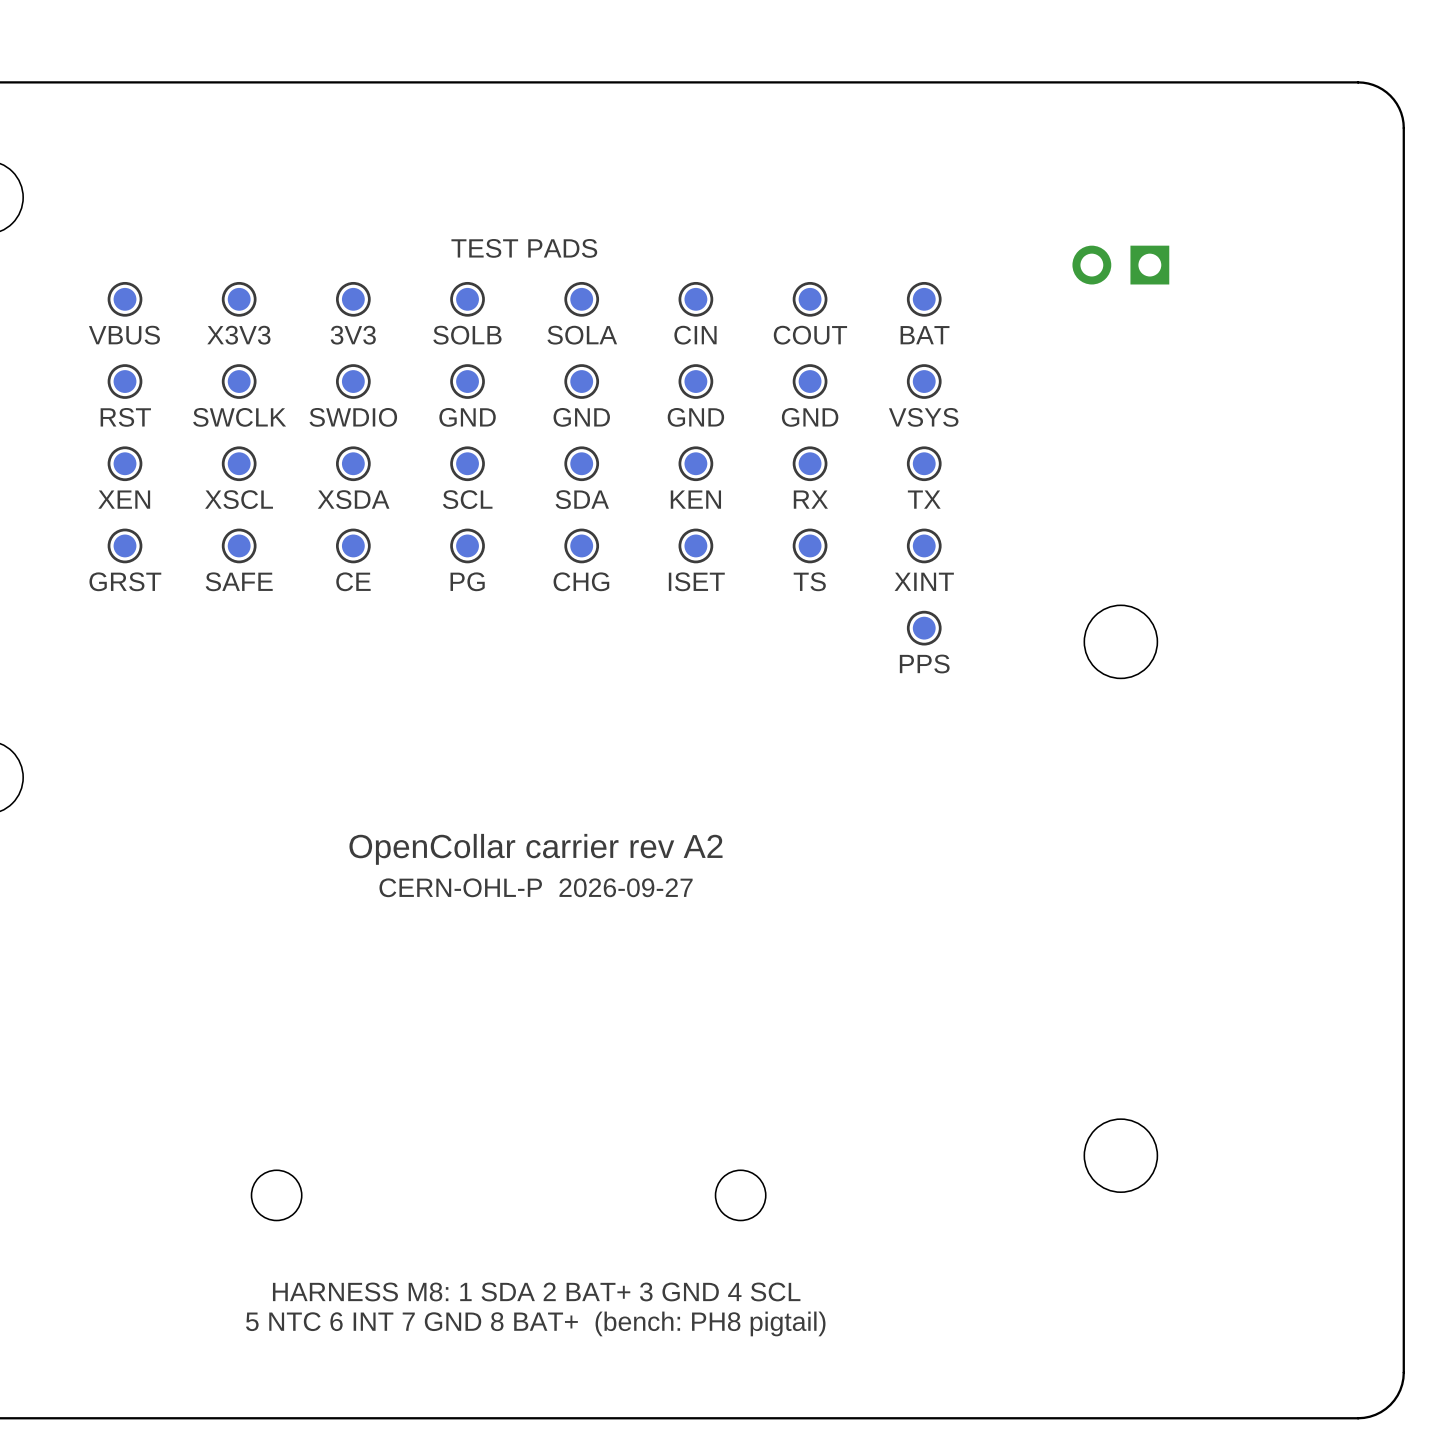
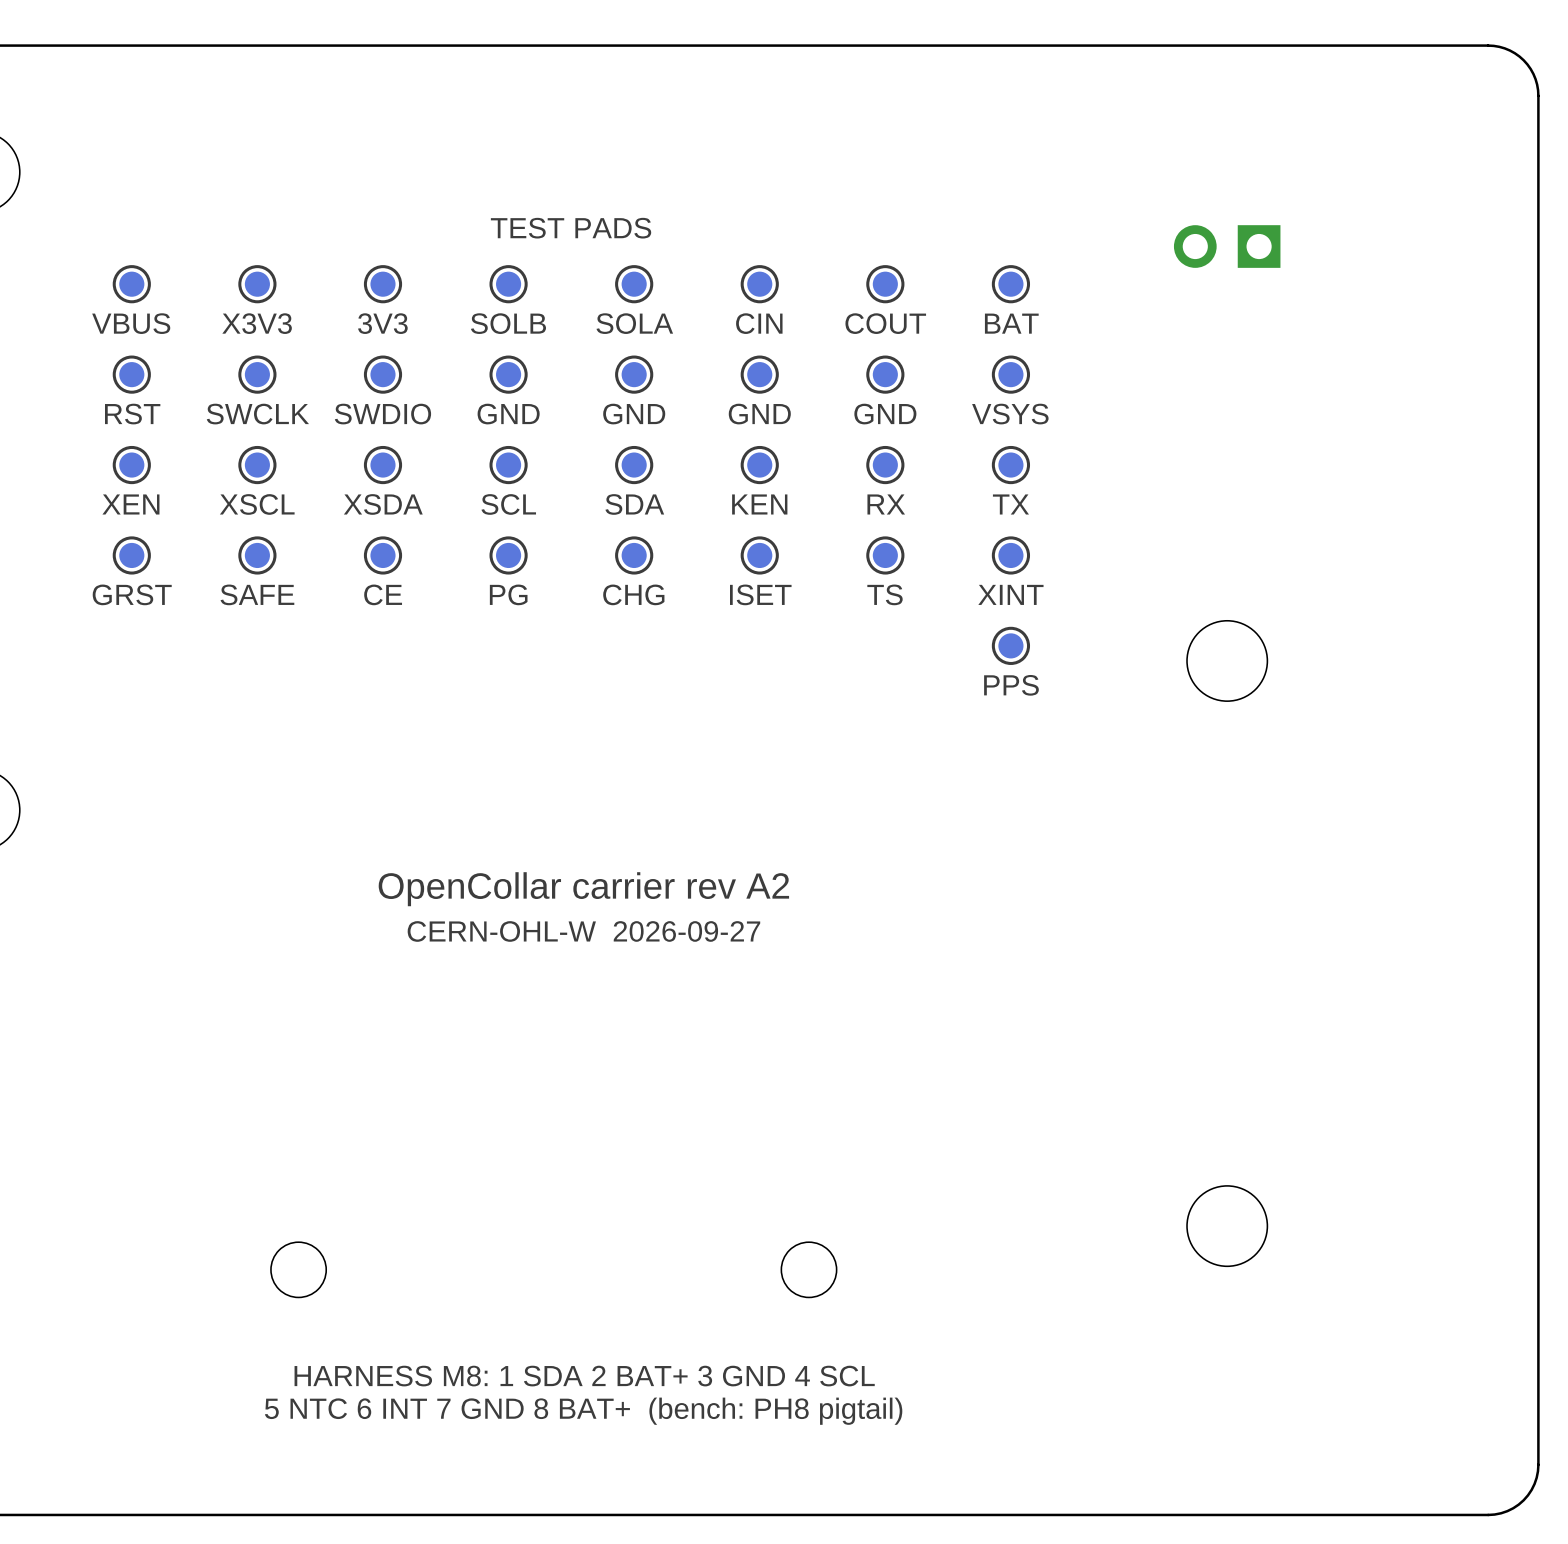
text: CERN-OHL-P 2026-09-27 (536, 887) -> CERN-OHL-W 2026-09-27 (583, 931)

